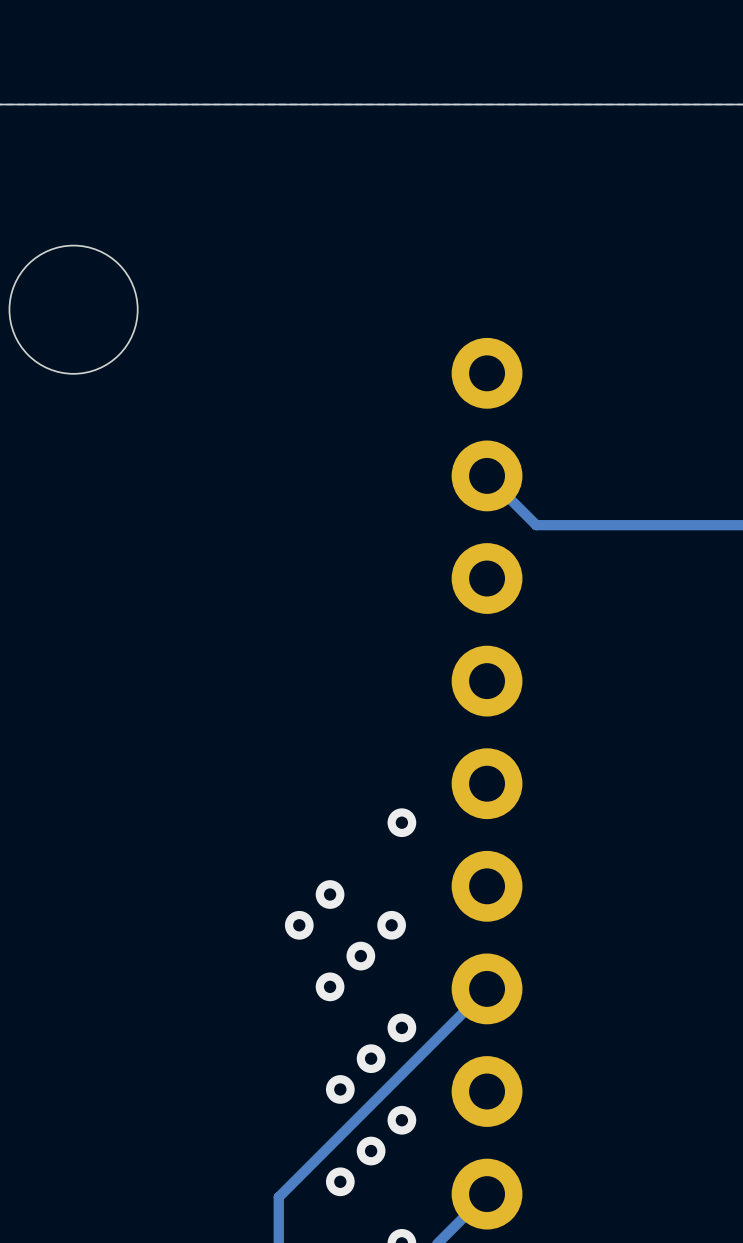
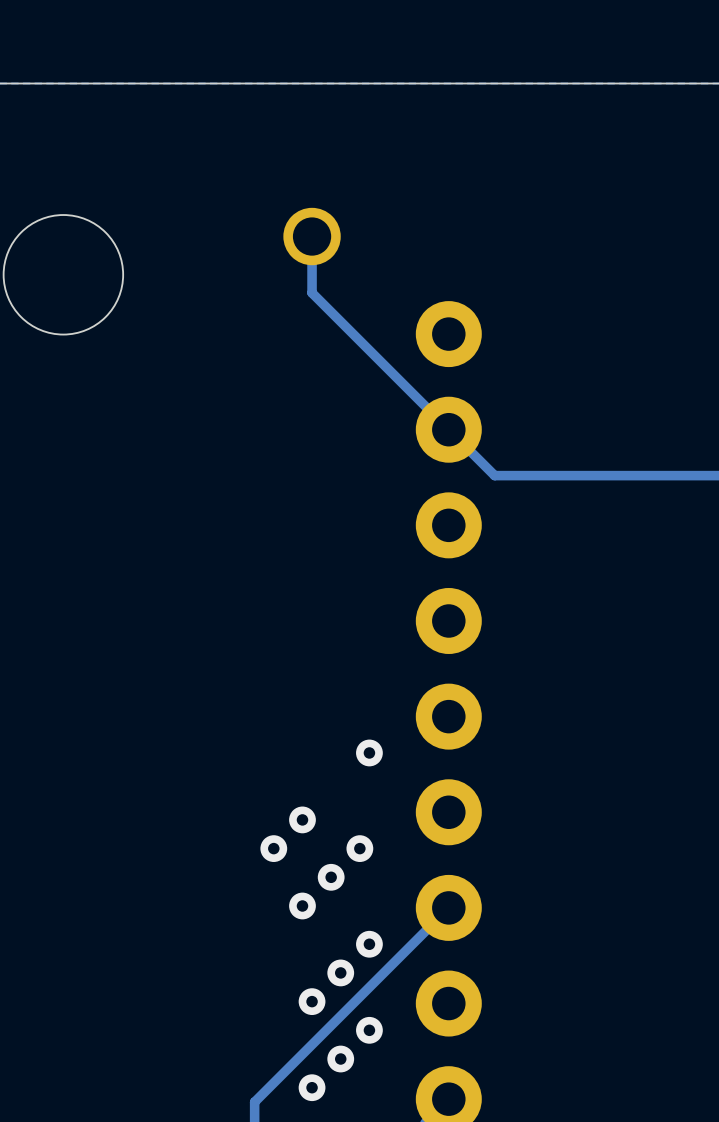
track: none -> (312, 236) (312, 292) (448, 429)
part: none -> (312, 236)

